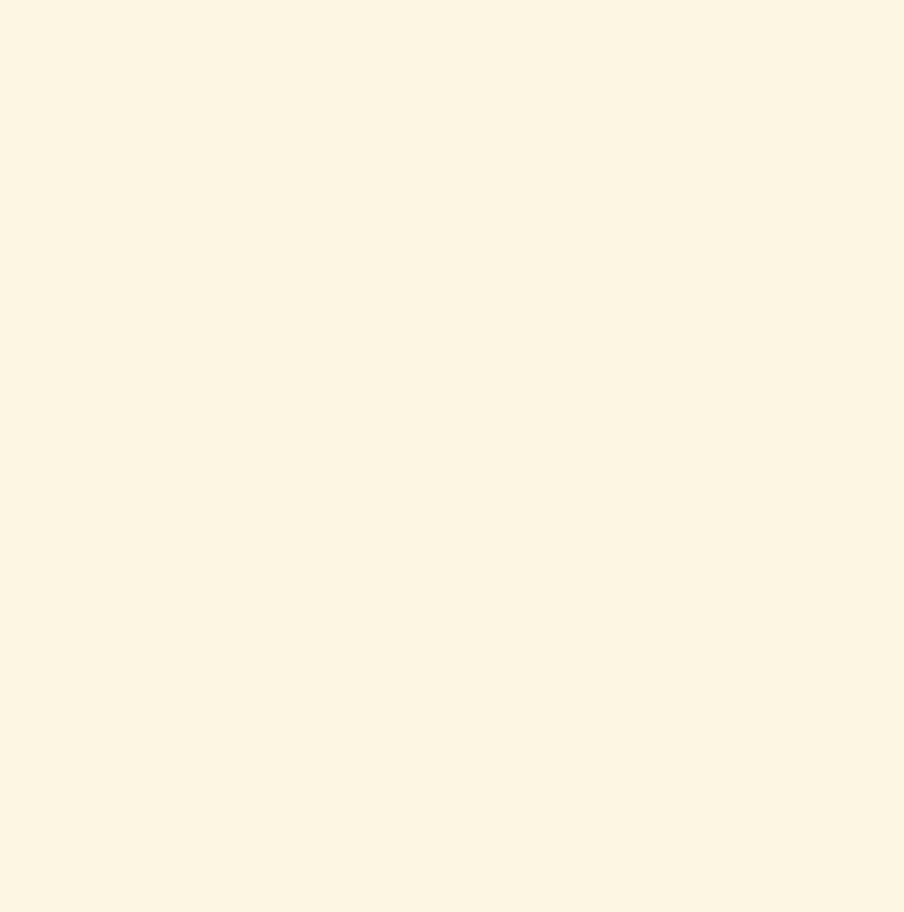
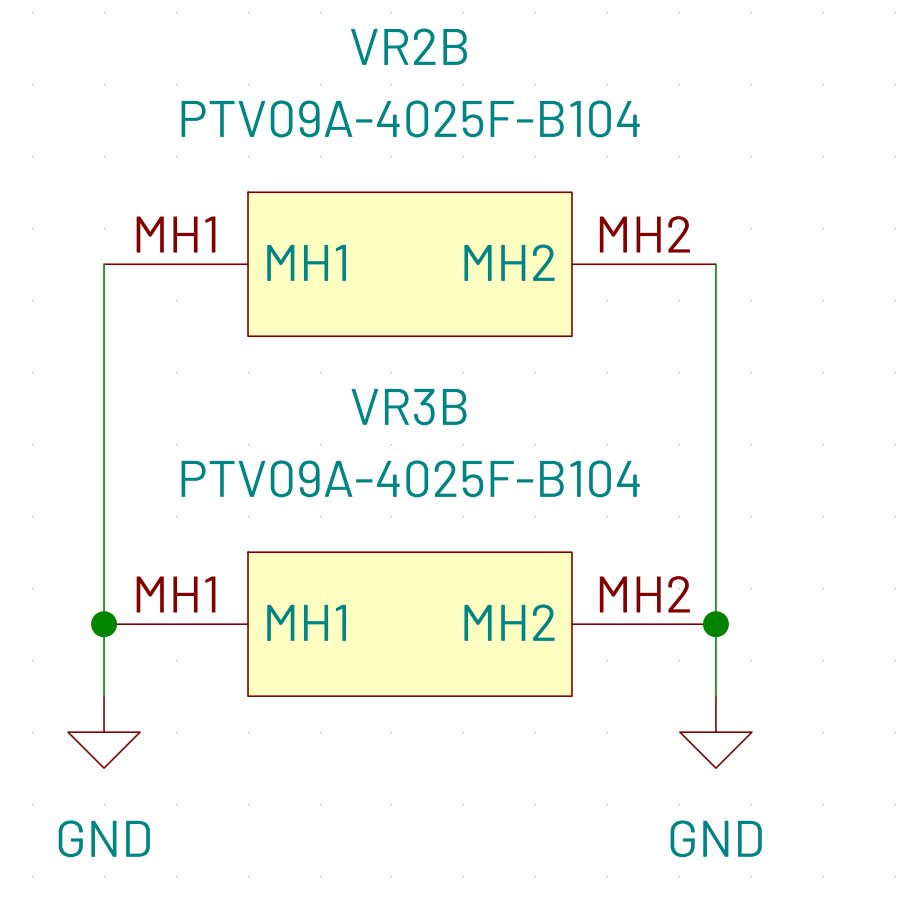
wire: none -> (104, 264) (104, 696)
VR2B: none -> PTV09A-4025F-B104 (409, 264)
wire: none -> (715, 264) (715, 696)
junction: none -> (104, 624)
VR3B: none -> PTV09A-4025F-B104 (409, 624)
junction: none -> (715, 624)
power symbol: none -> GND (104, 732)
power symbol: none -> GND (715, 732)

